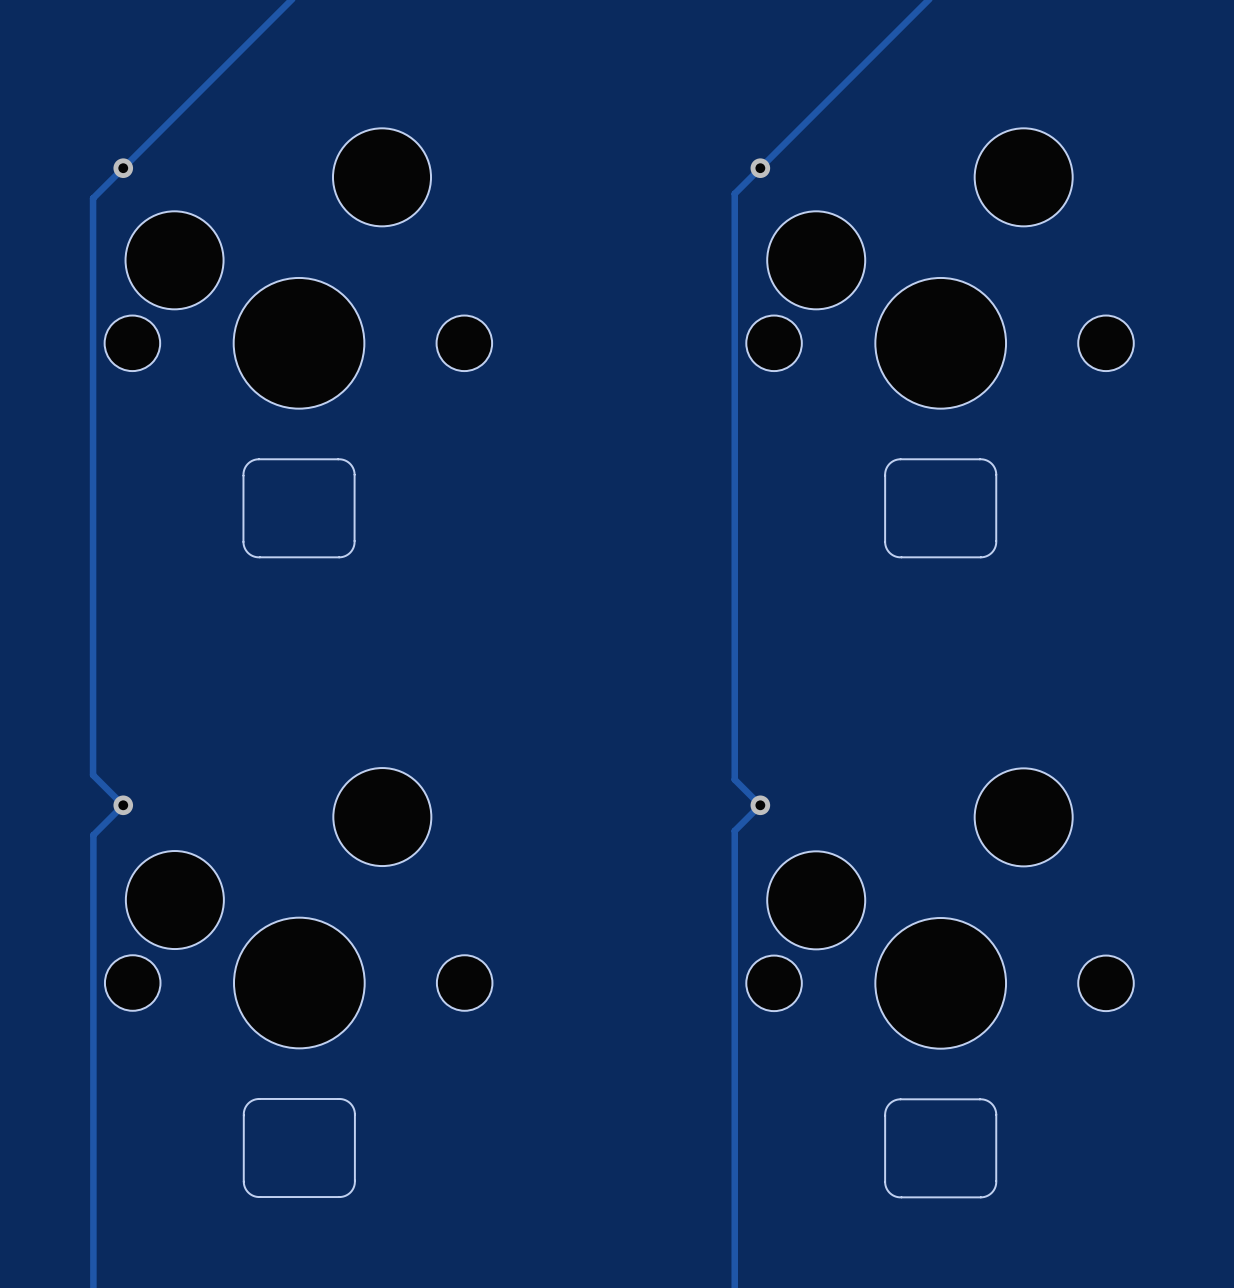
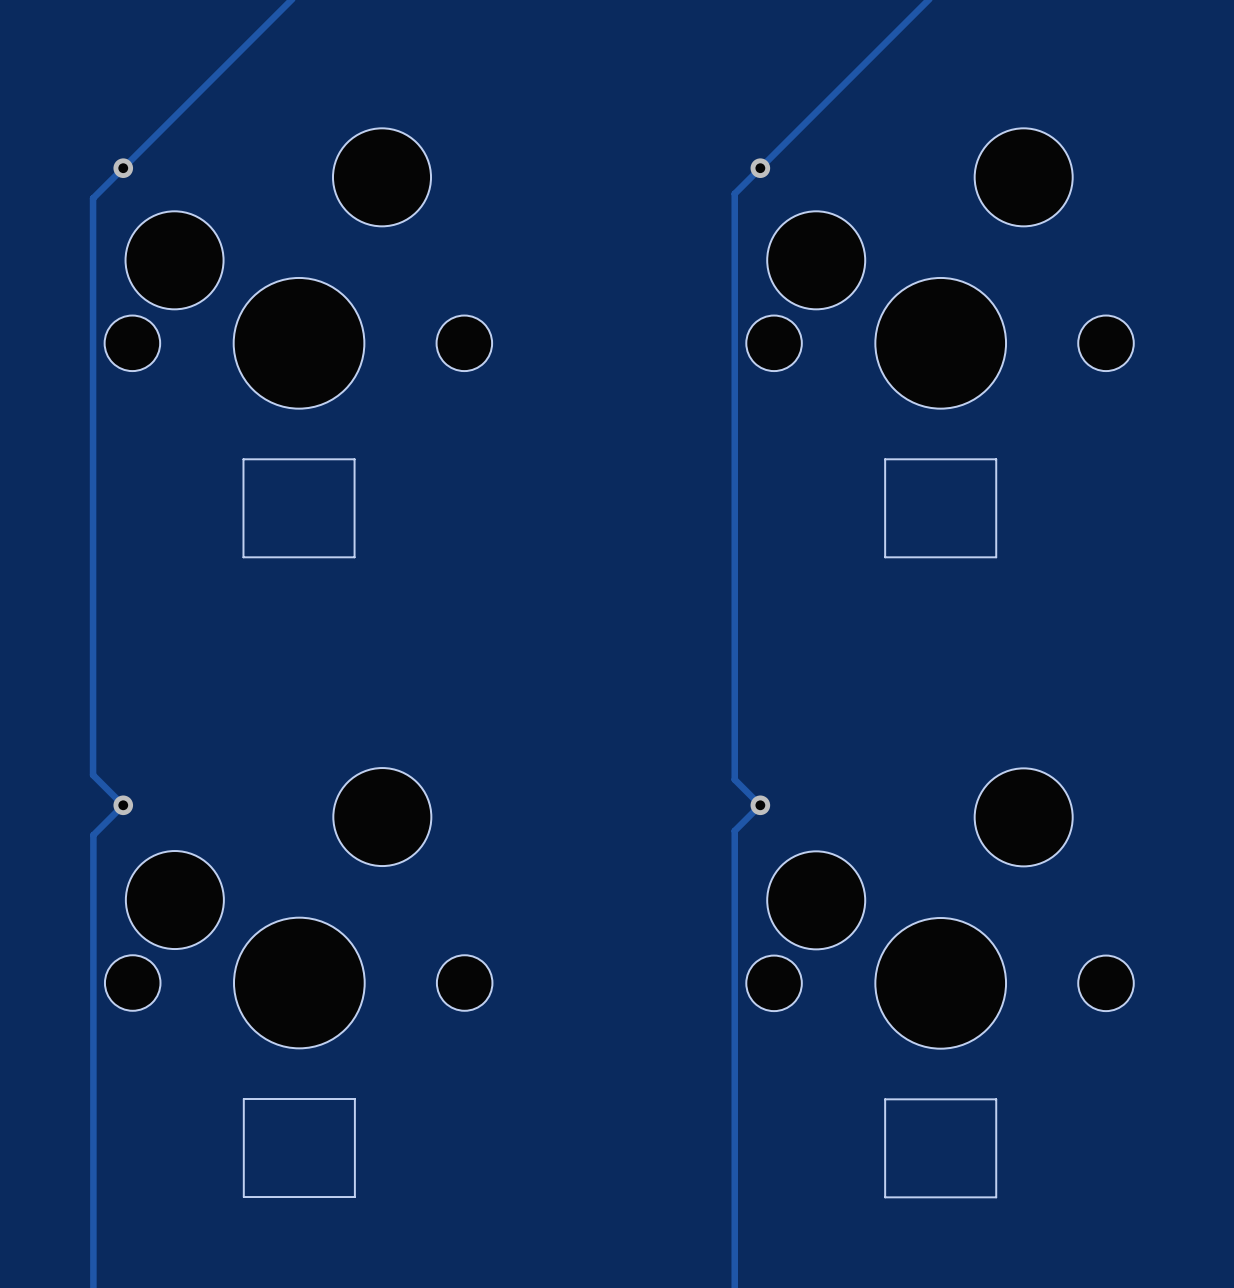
part footprint: [104, 128, 493, 559] -> [104, 128, 493, 559]
part footprint: [746, 128, 1134, 559] -> [746, 128, 1134, 559]
part footprint: [104, 768, 493, 1198] -> [104, 768, 493, 1198]
part footprint: [746, 768, 1134, 1199] -> [746, 768, 1134, 1199]

